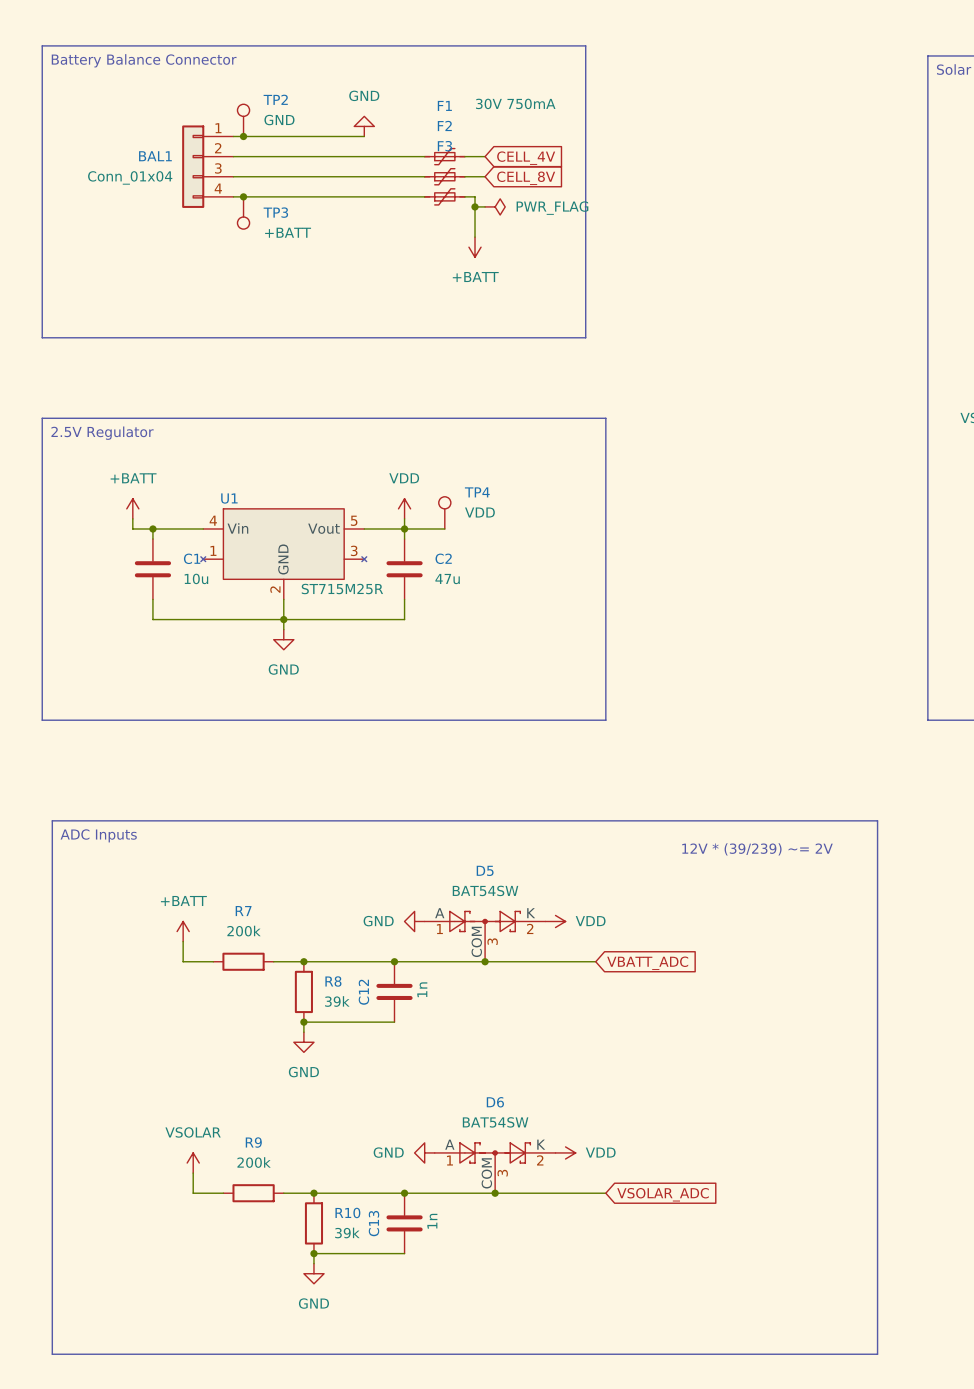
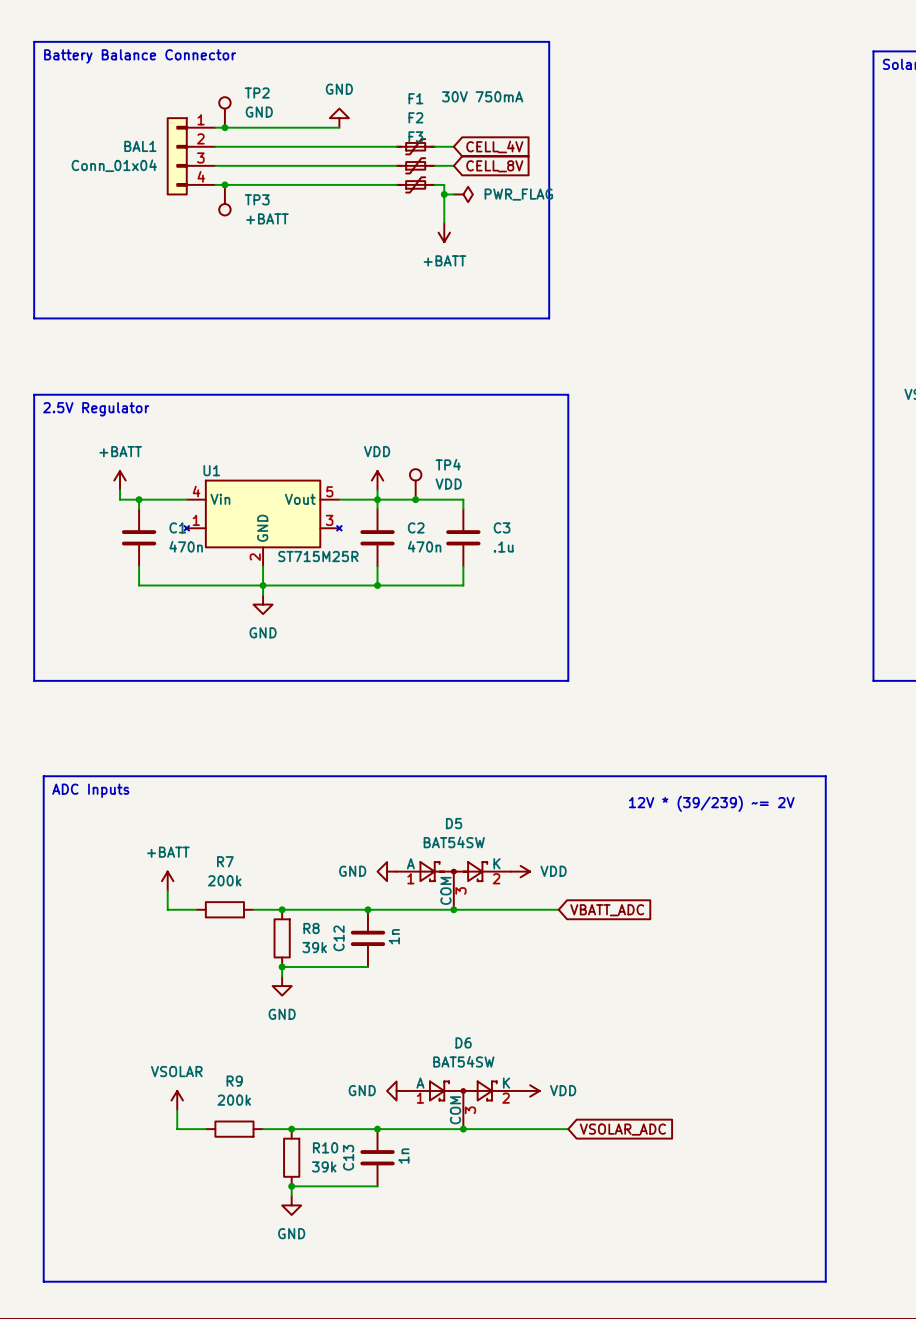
wire: none -> (415, 499) (463, 499) (463, 509)
junction: none -> (415, 499)
C3: none -> .1u (463, 537)
C1 value: 10u (196, 578) -> 470n (186, 546)
C2 value: 47u (447, 579) -> 470n (424, 546)
wire: none -> (463, 566) (463, 585) (377, 585)
junction: none -> (377, 585)

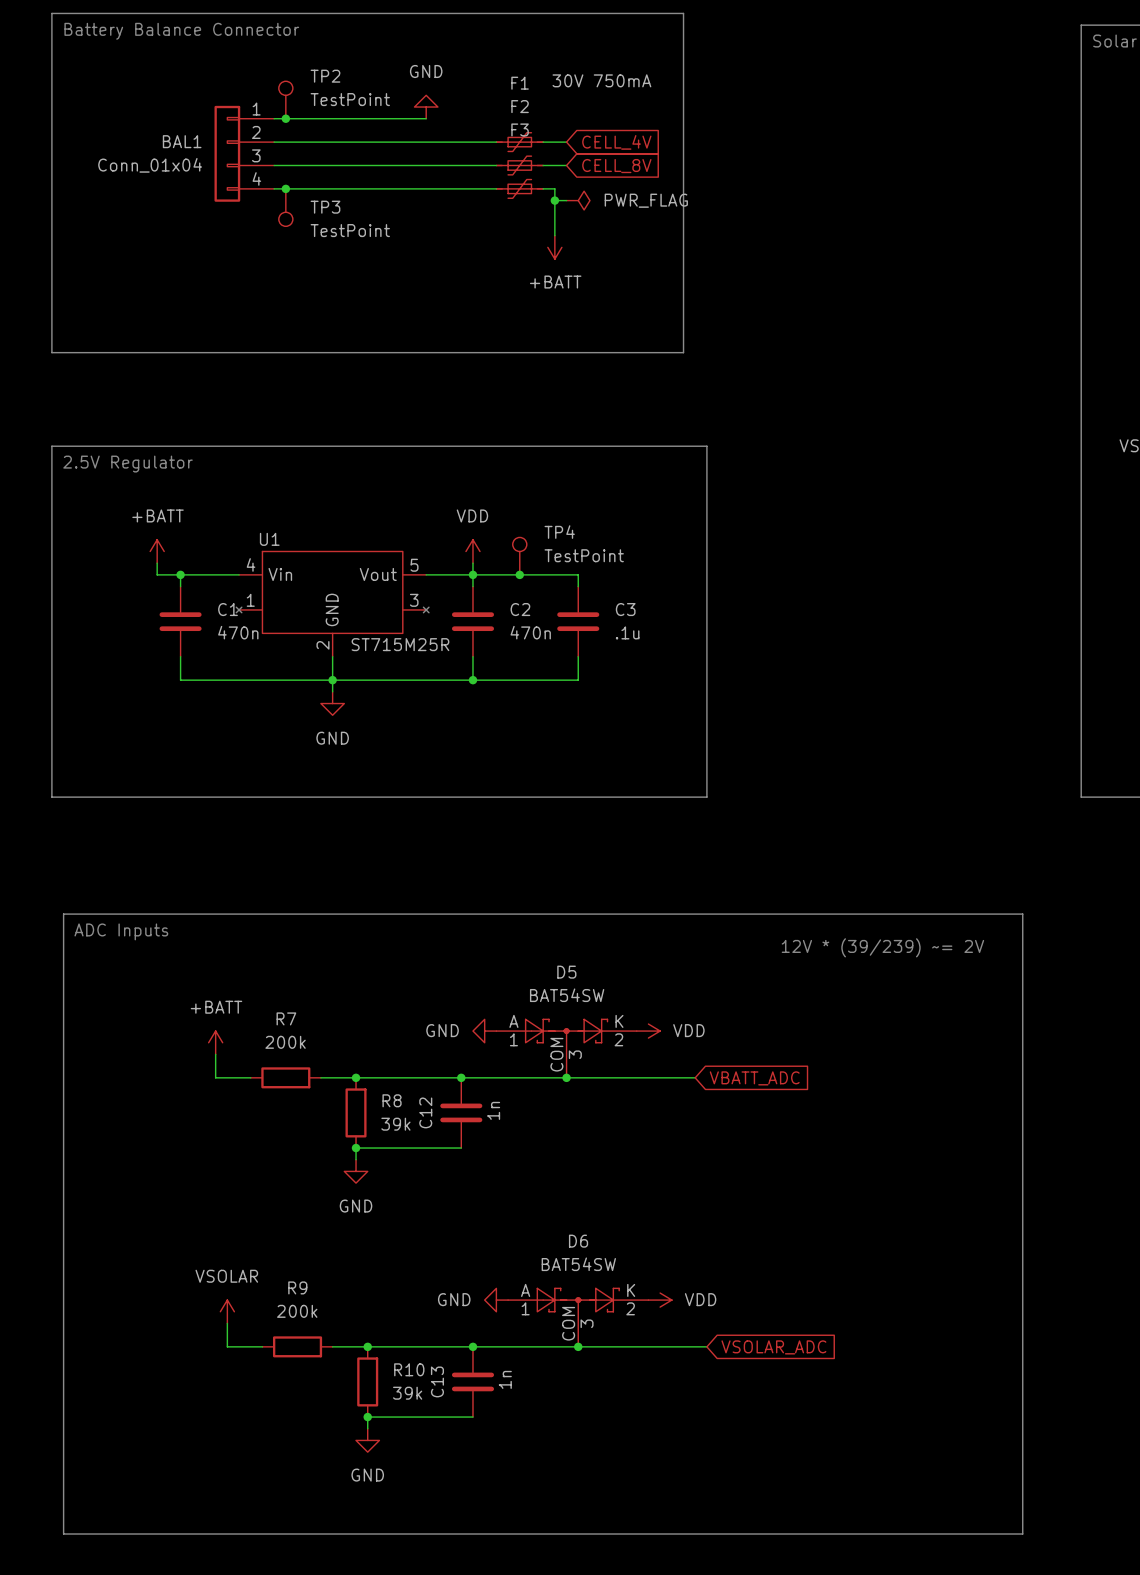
TP2 value: GND (259, 112) -> TestPoint (350, 99)
TP3 value: +BATT (267, 218) -> TestPoint (350, 230)
TP4 value: VDD (448, 484) -> TestPoint (584, 555)

